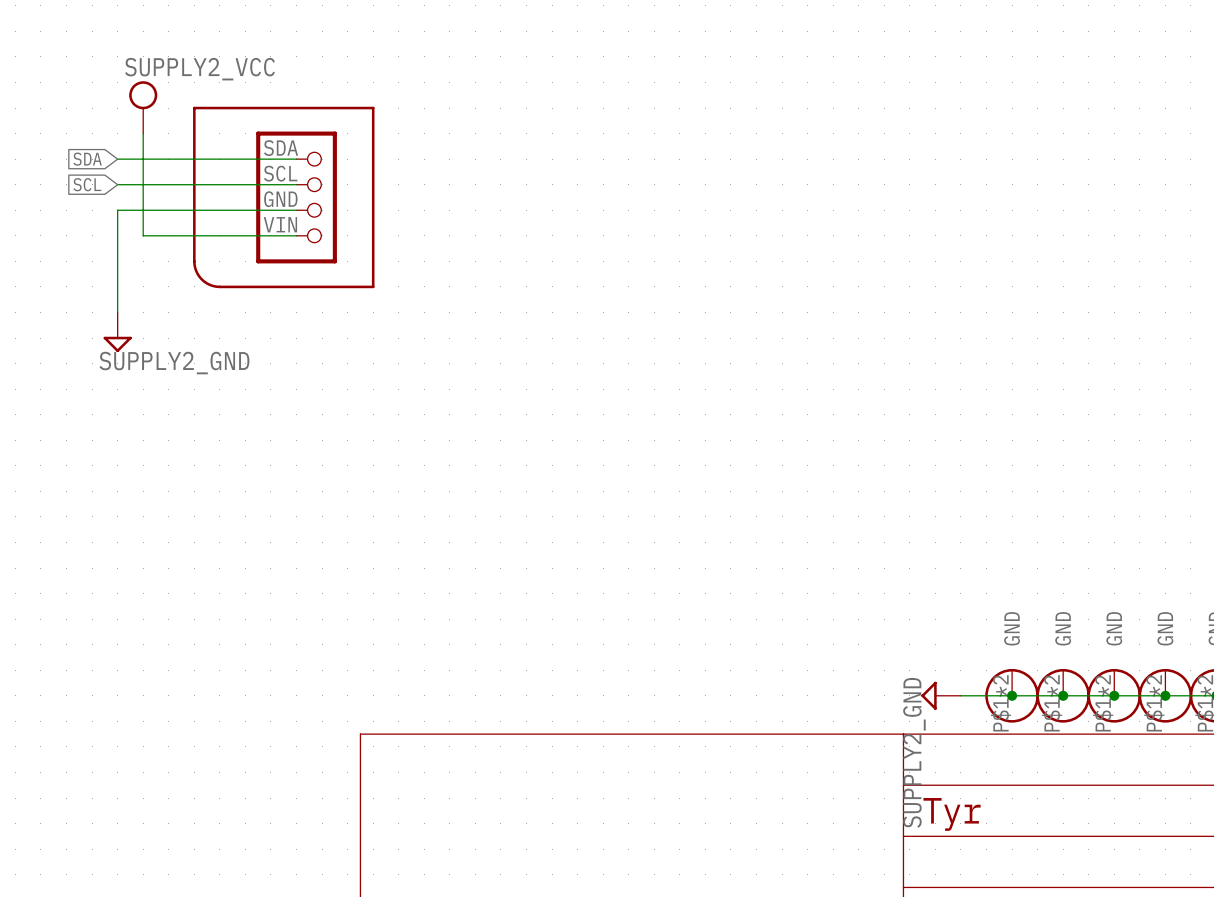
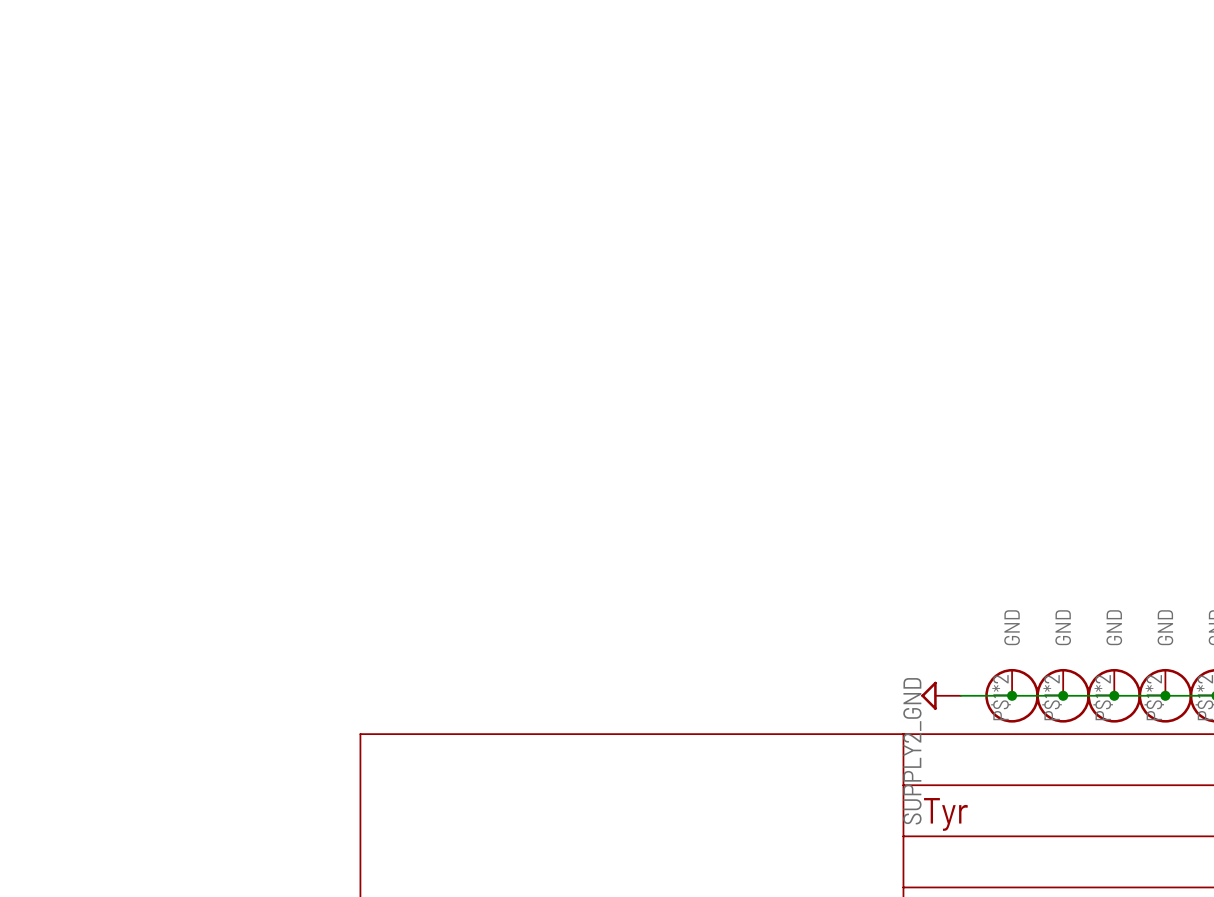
power symbol: SUPPLY2_VCC (143, 107) -> none
wire: (143, 133) (143, 235) (296, 235) -> none
global label: SDA (87, 159) -> none
wire: (117, 159) (296, 159) -> none
global label: SCL (87, 184) -> none
wire: (117, 184) (296, 184) -> none
part: (283, 197) -> none
wire: (296, 210) (117, 210) (117, 312) -> none
power symbol: SUPPLY2_GND (117, 332) -> none

